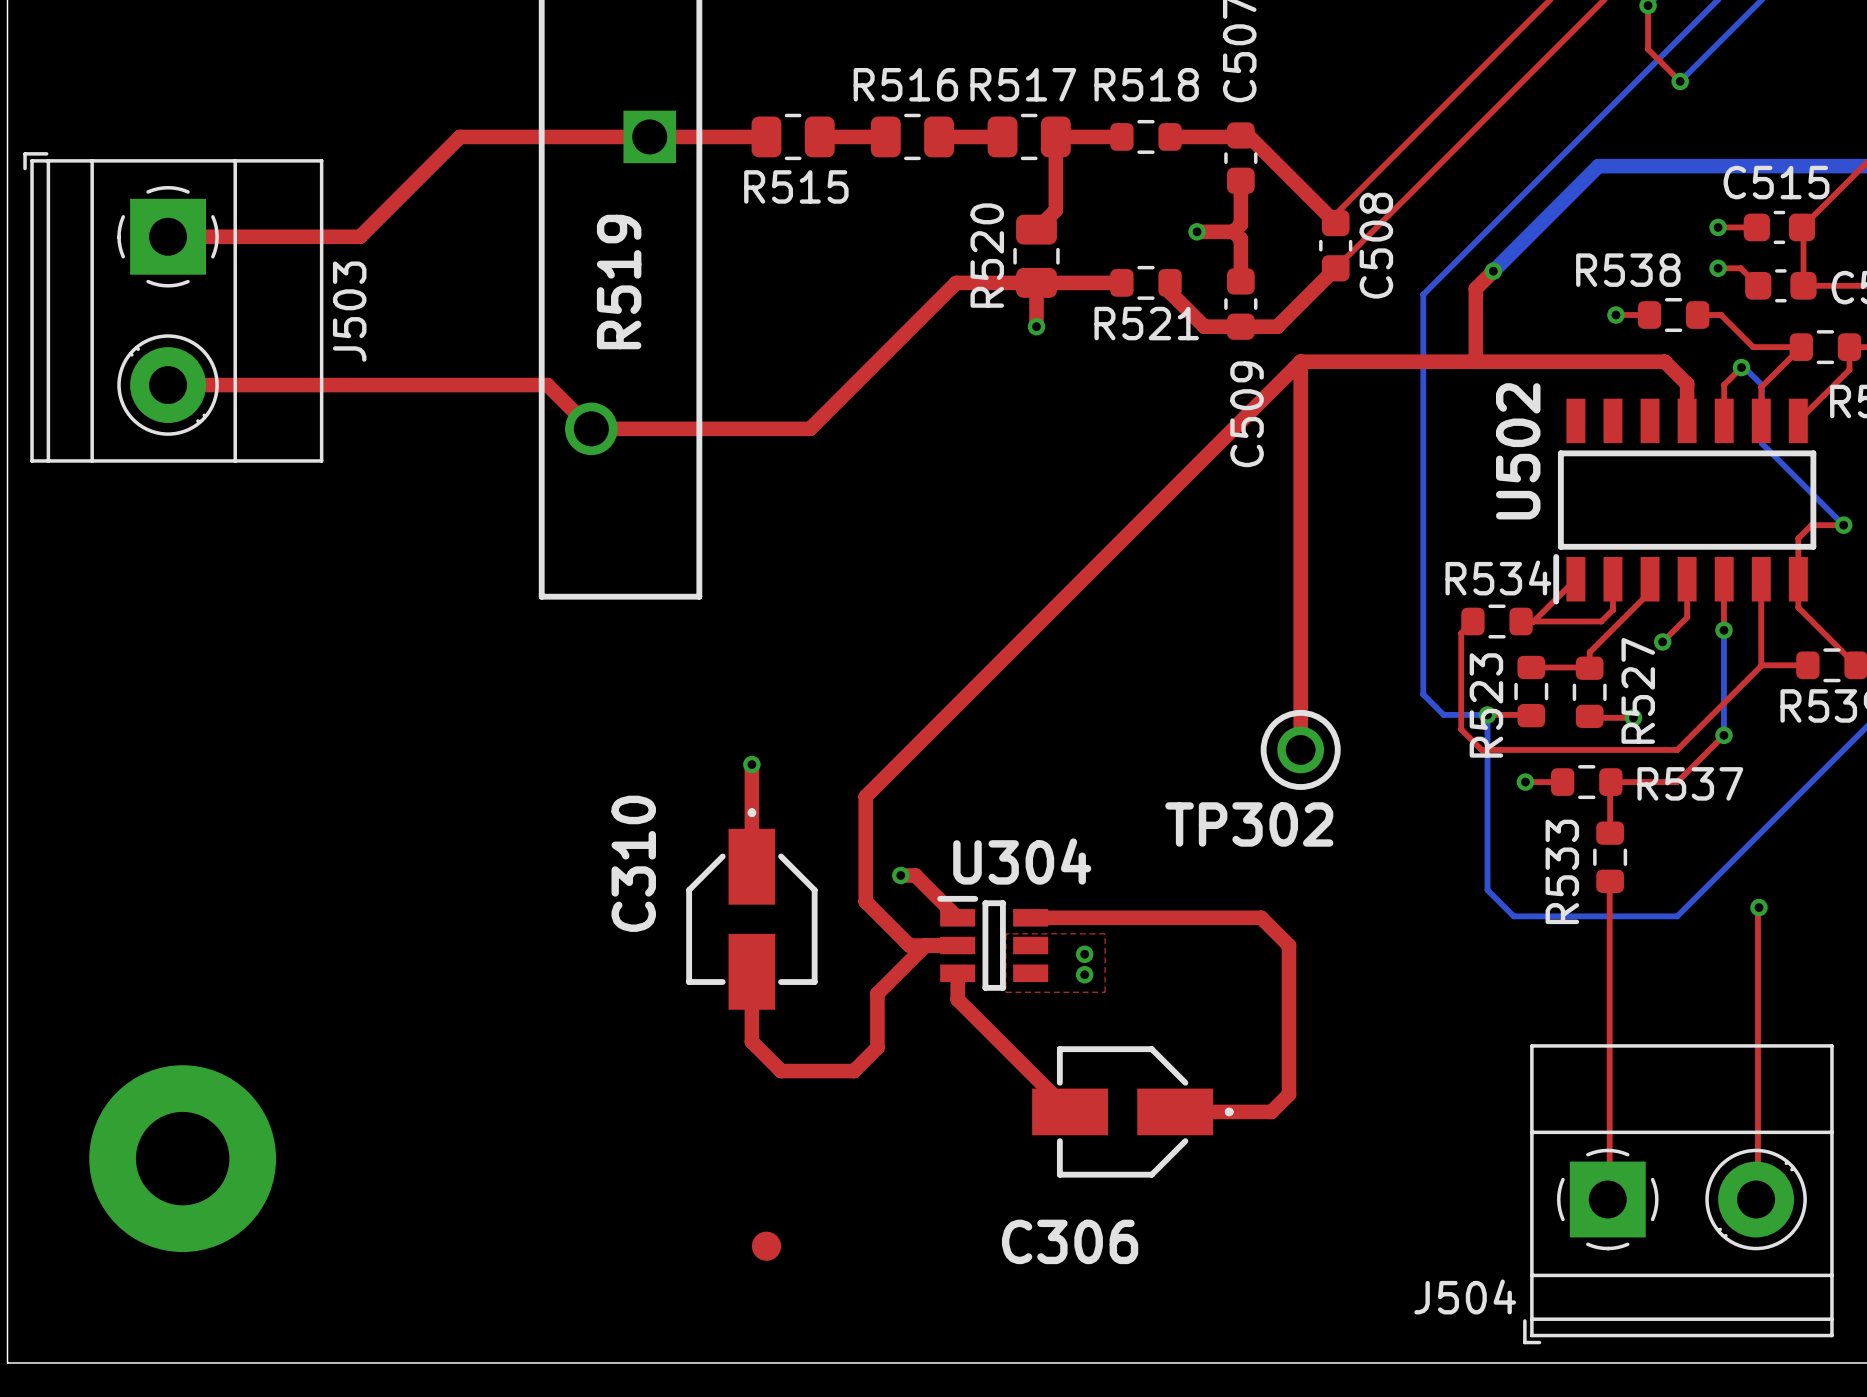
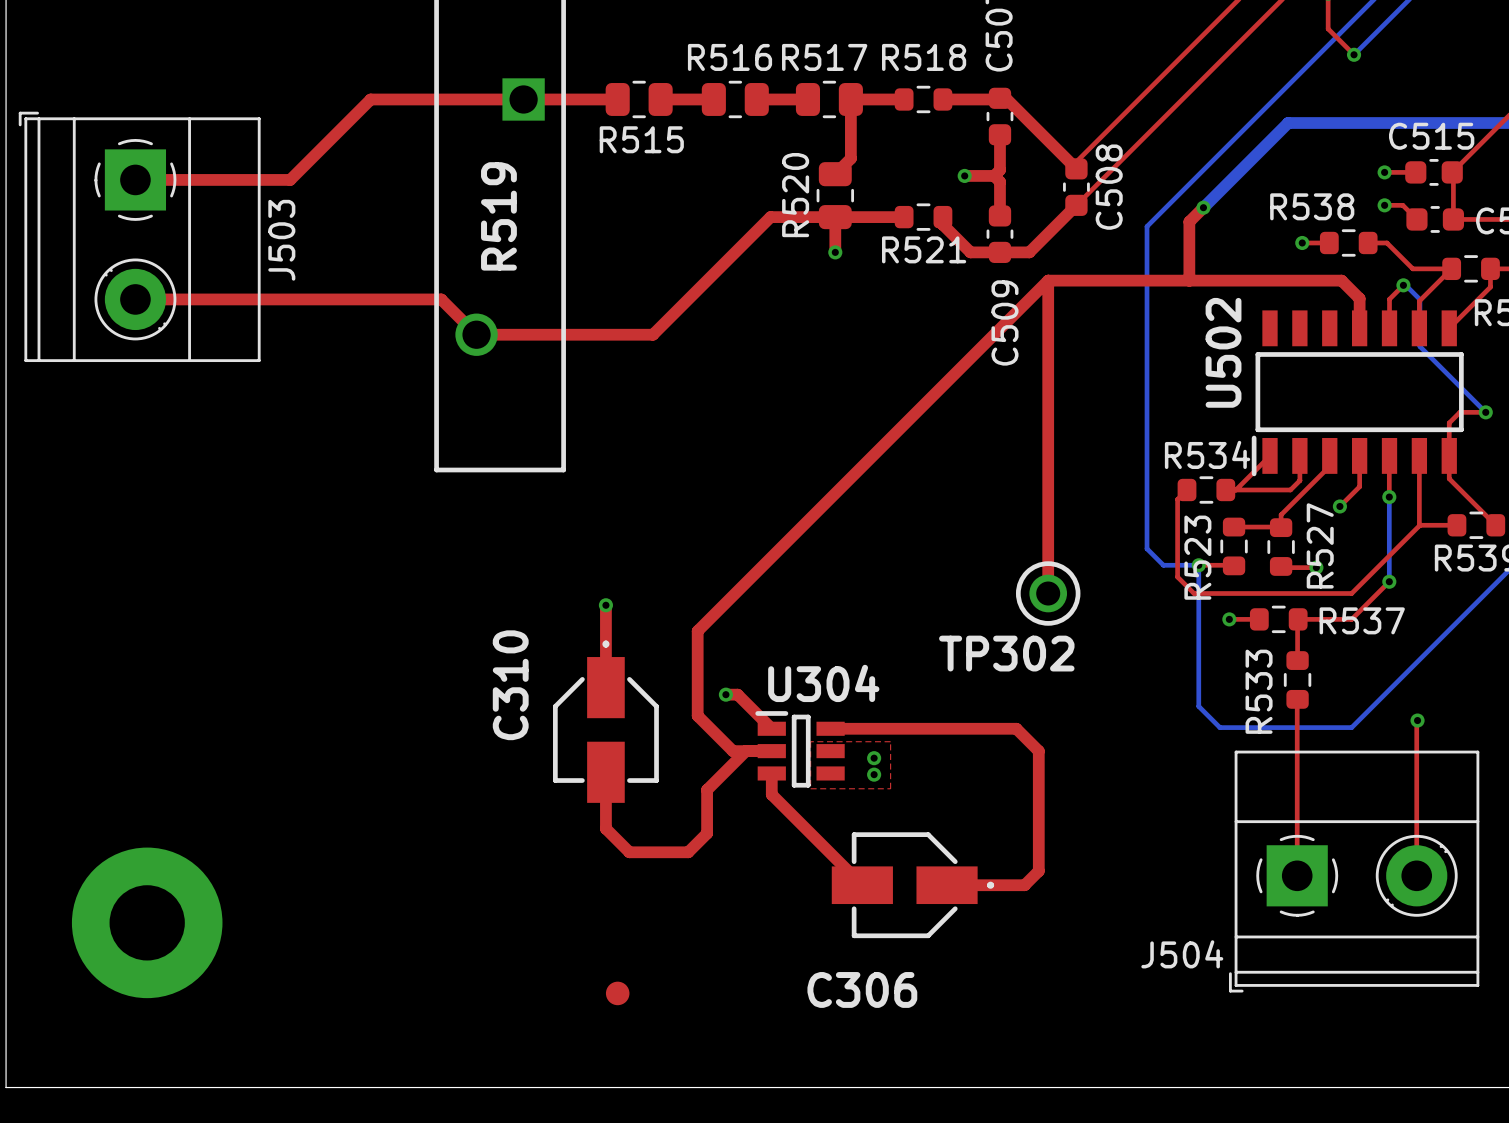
top track: (1609, 1100) (1609, 1197) (1607, 1199) -> none
top track: (1757, 1100) (1757, 1197) (1756, 1199) -> none
J504 position: (1678, 1194) -> (1354, 871)

